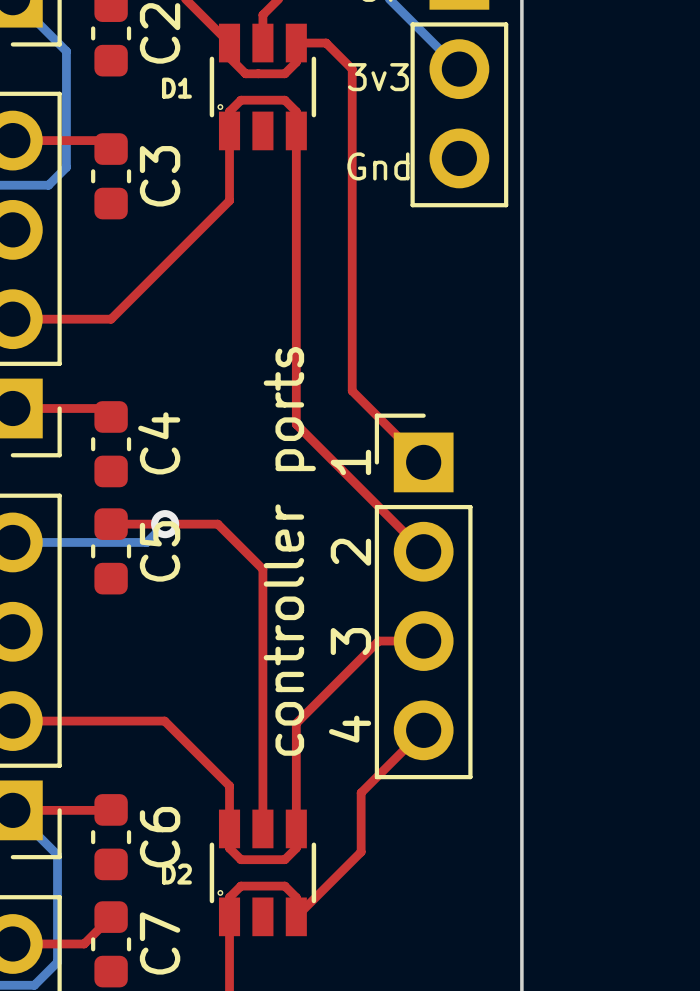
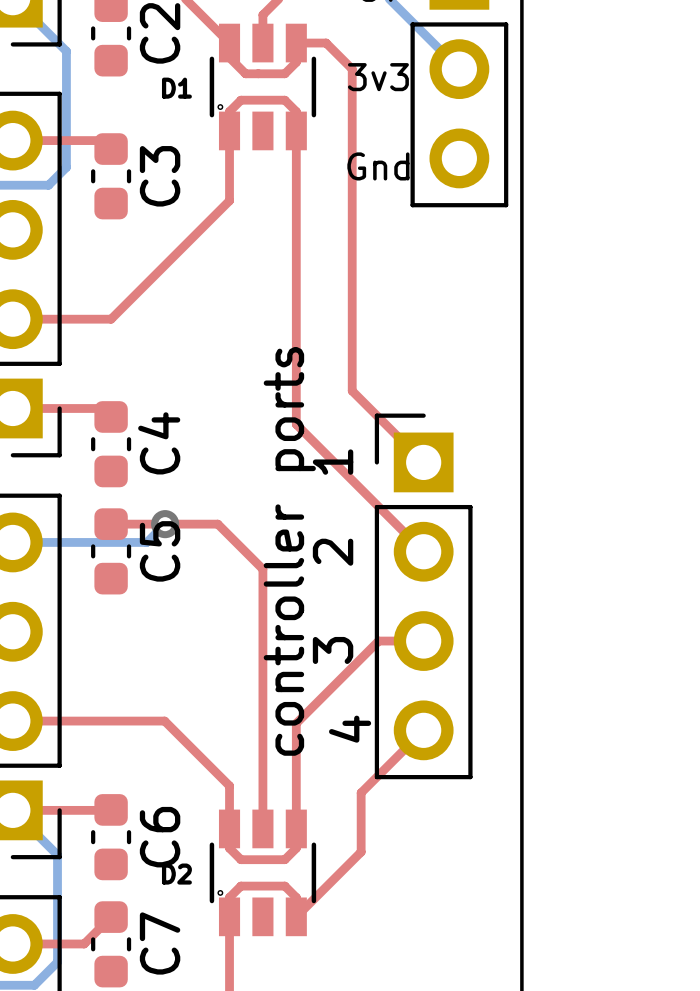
text position: 1 (350, 462) -> 1 (333, 462)
text position: 2 (350, 552) -> 2 (333, 552)
text position: 3 (350, 641) -> 3 (333, 650)

